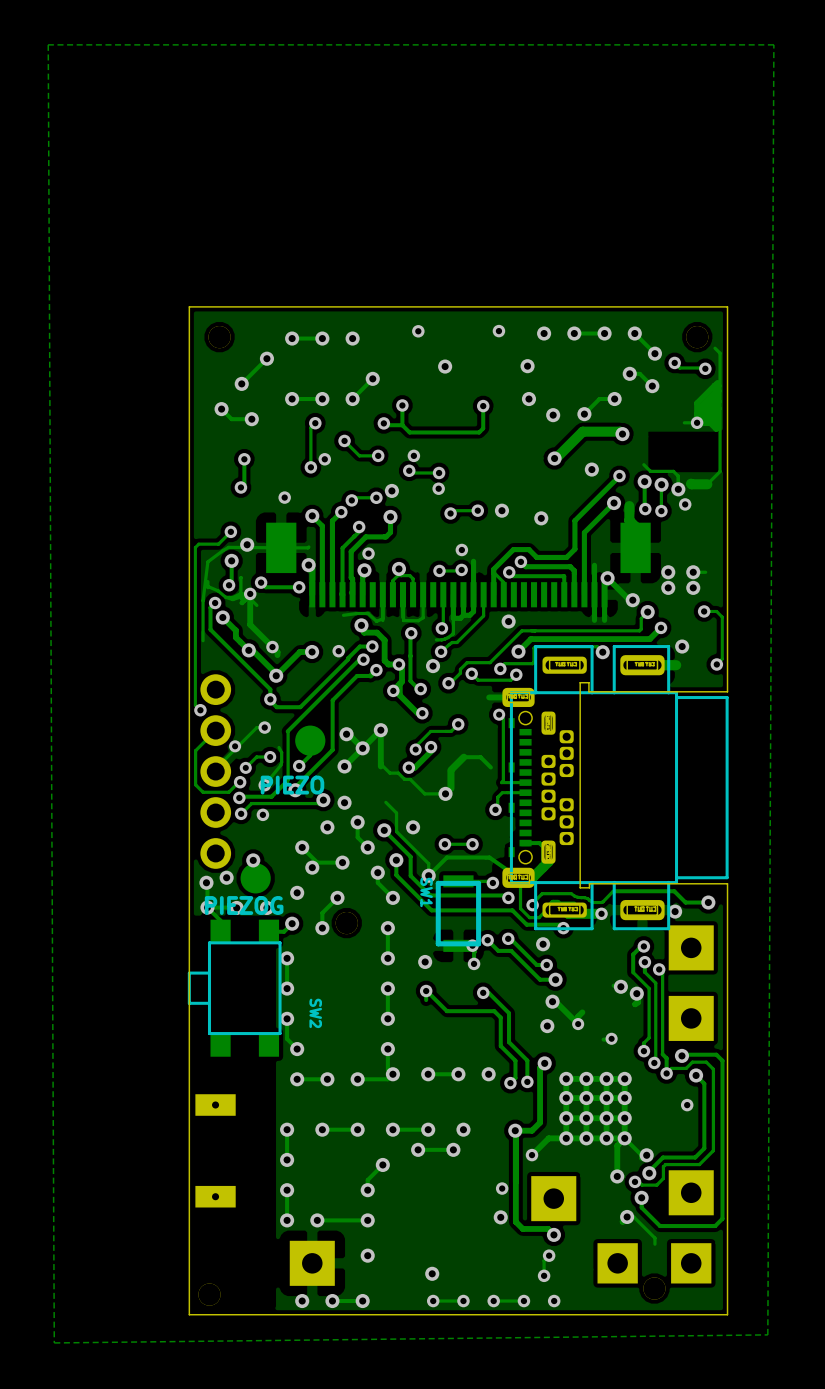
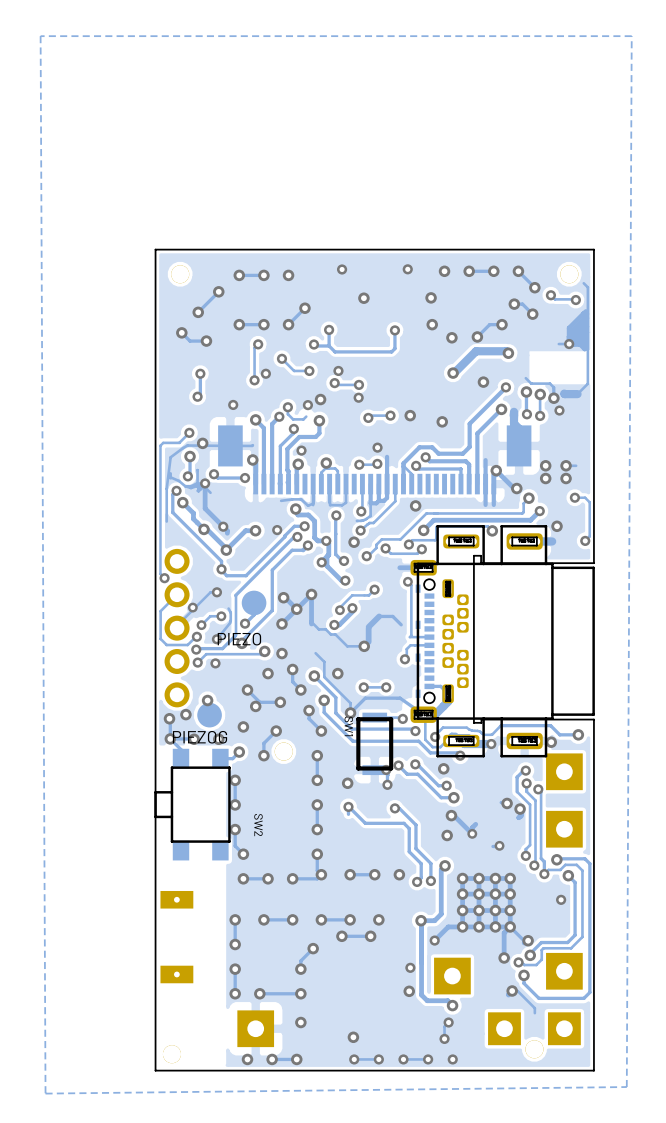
track: (376, 497) (354, 497) -> none
track: none -> (287, 407) (287, 414) (293, 419) (303, 419) (306, 416)

